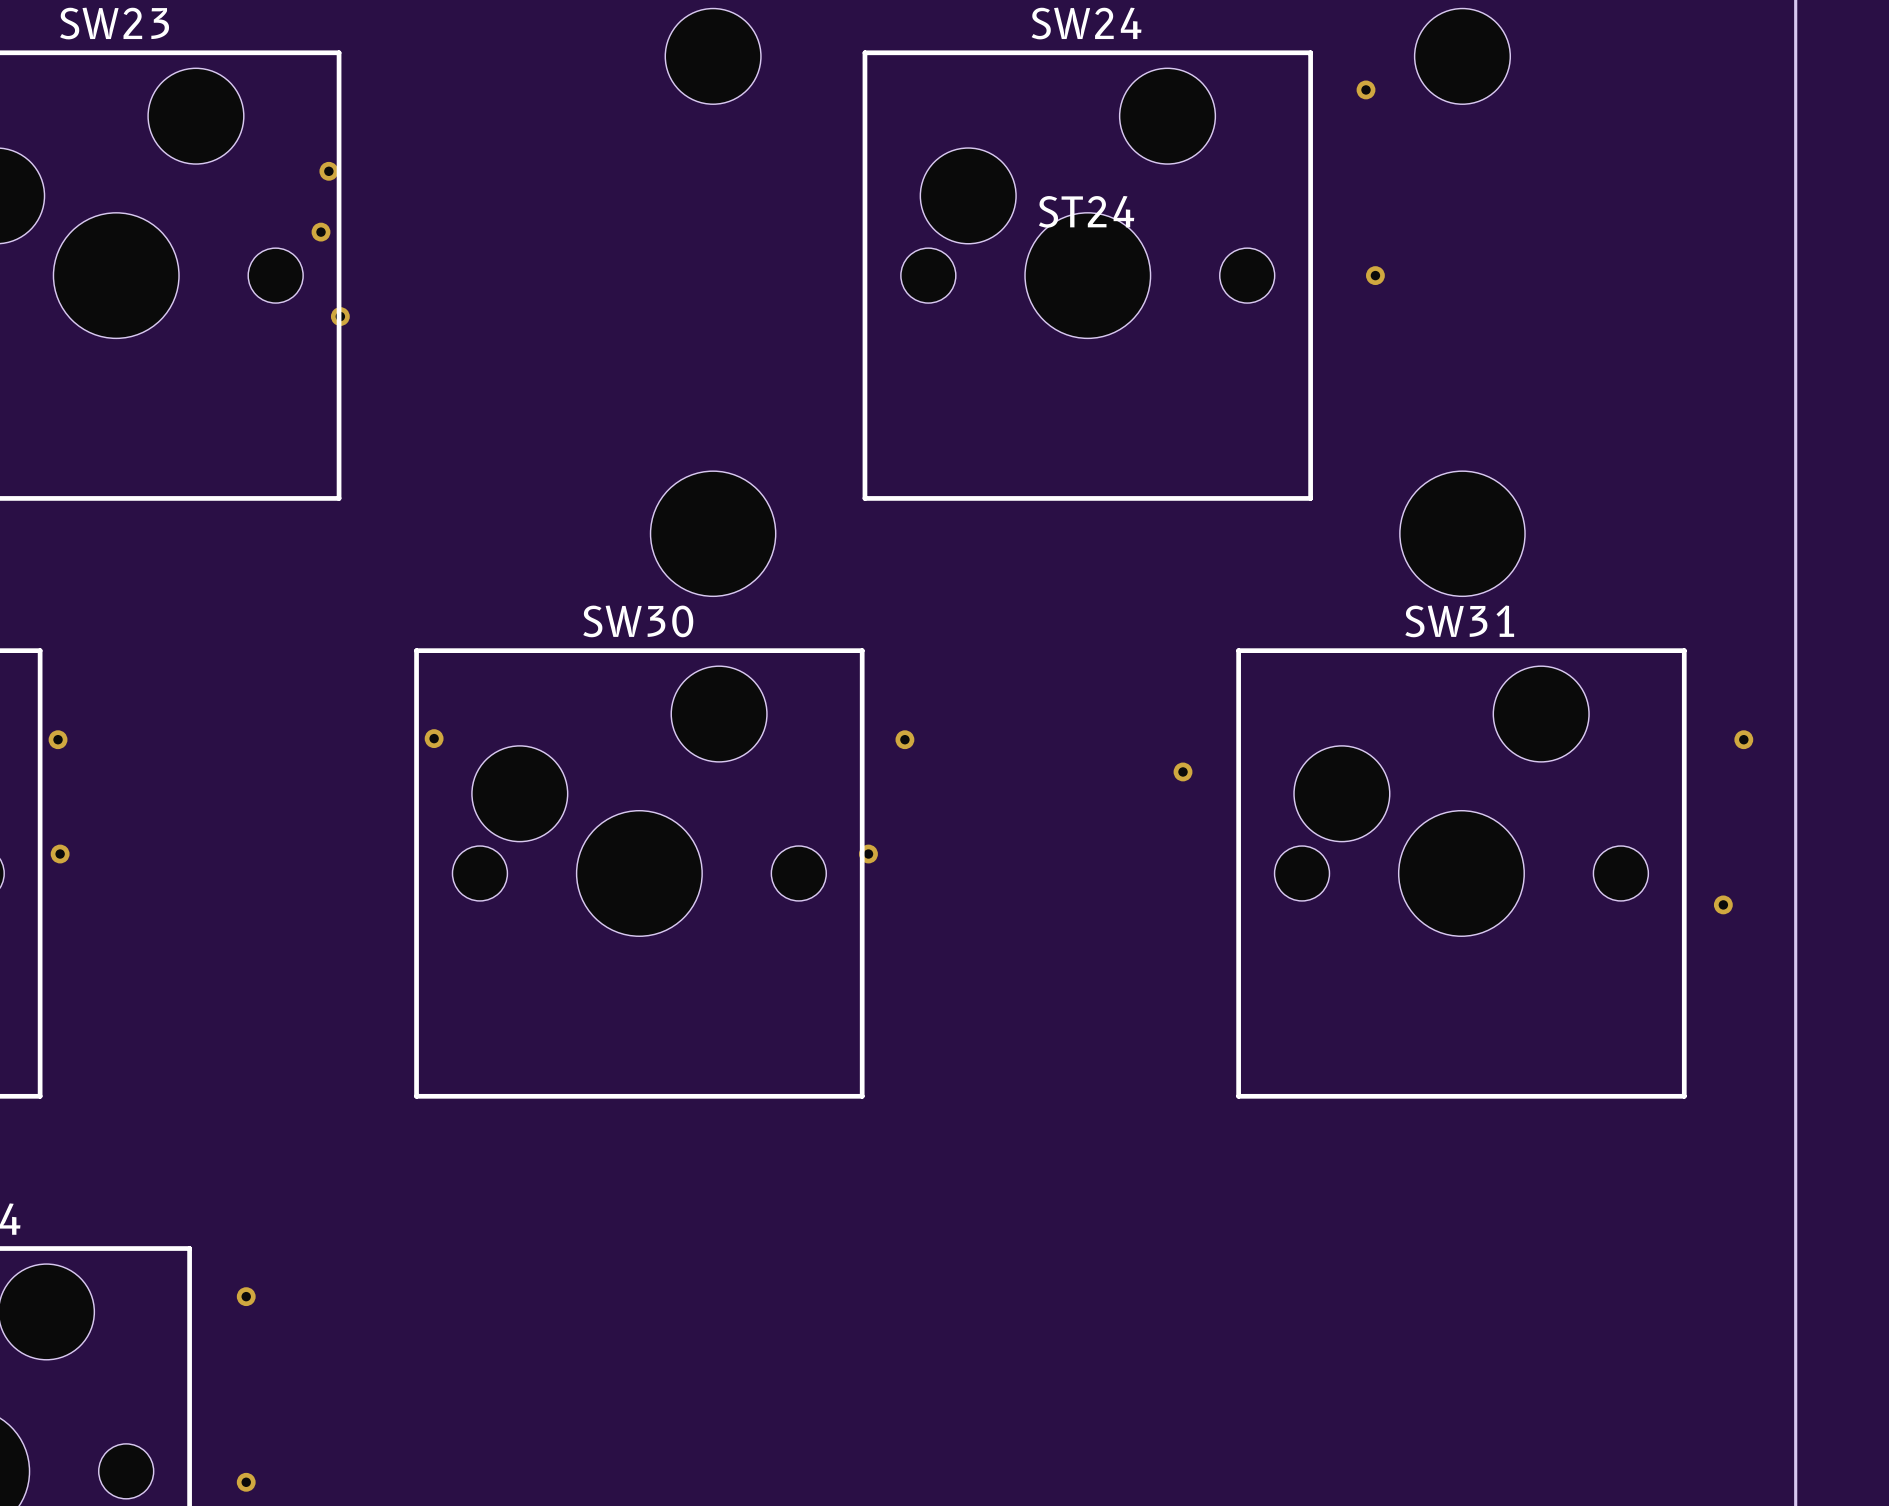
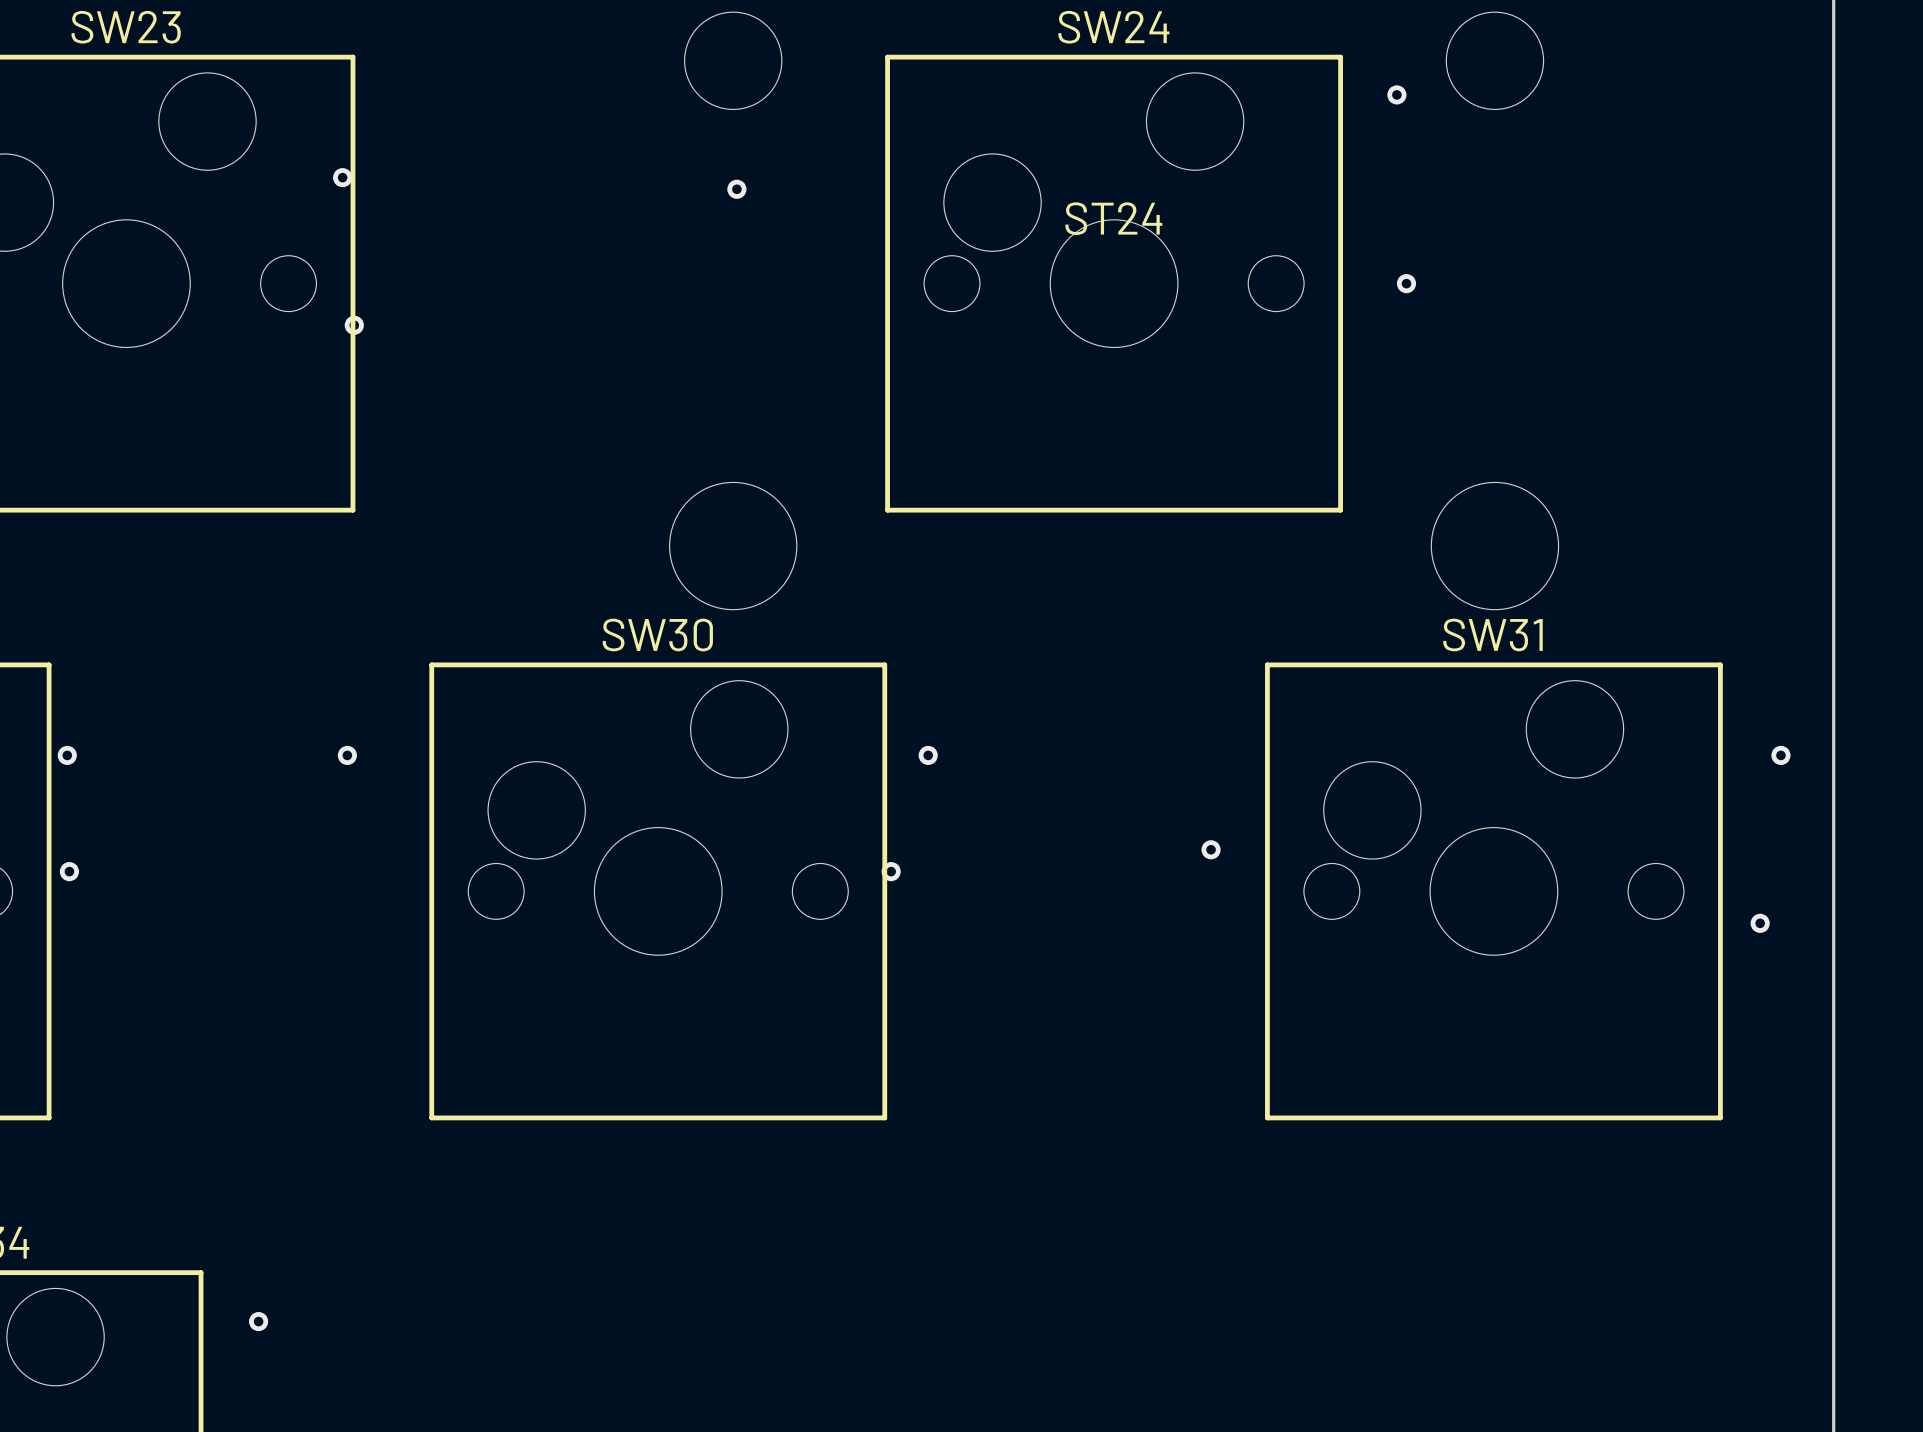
via: none -> (736, 189)
via: (321, 232) -> none
via position: (434, 738) -> (347, 755)
via position: (1183, 771) -> (1211, 849)

